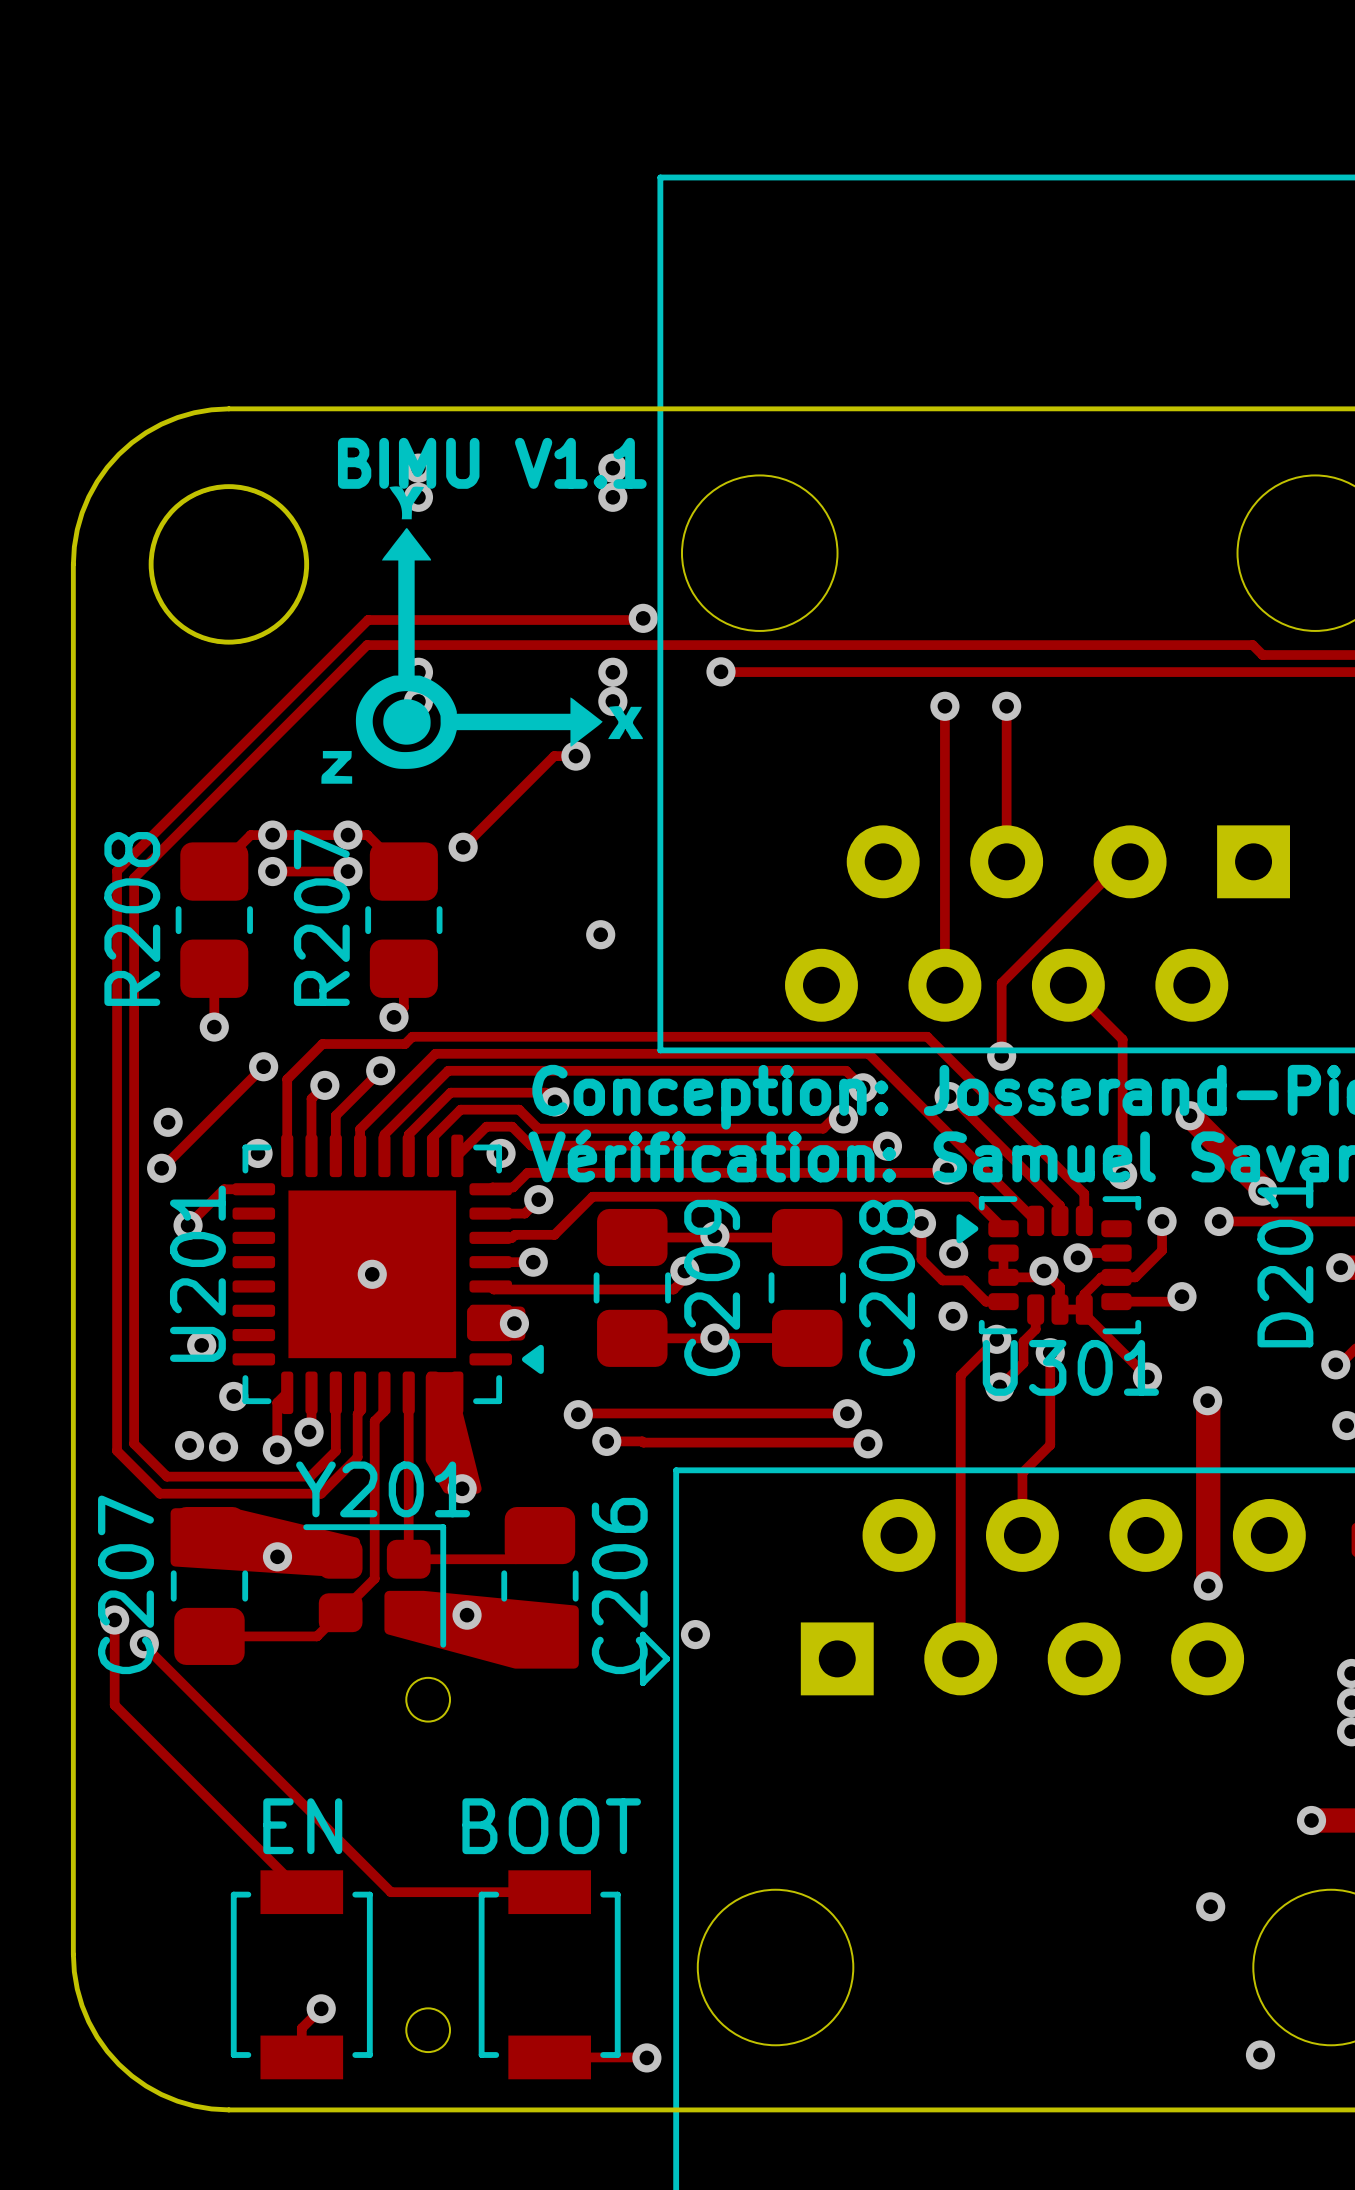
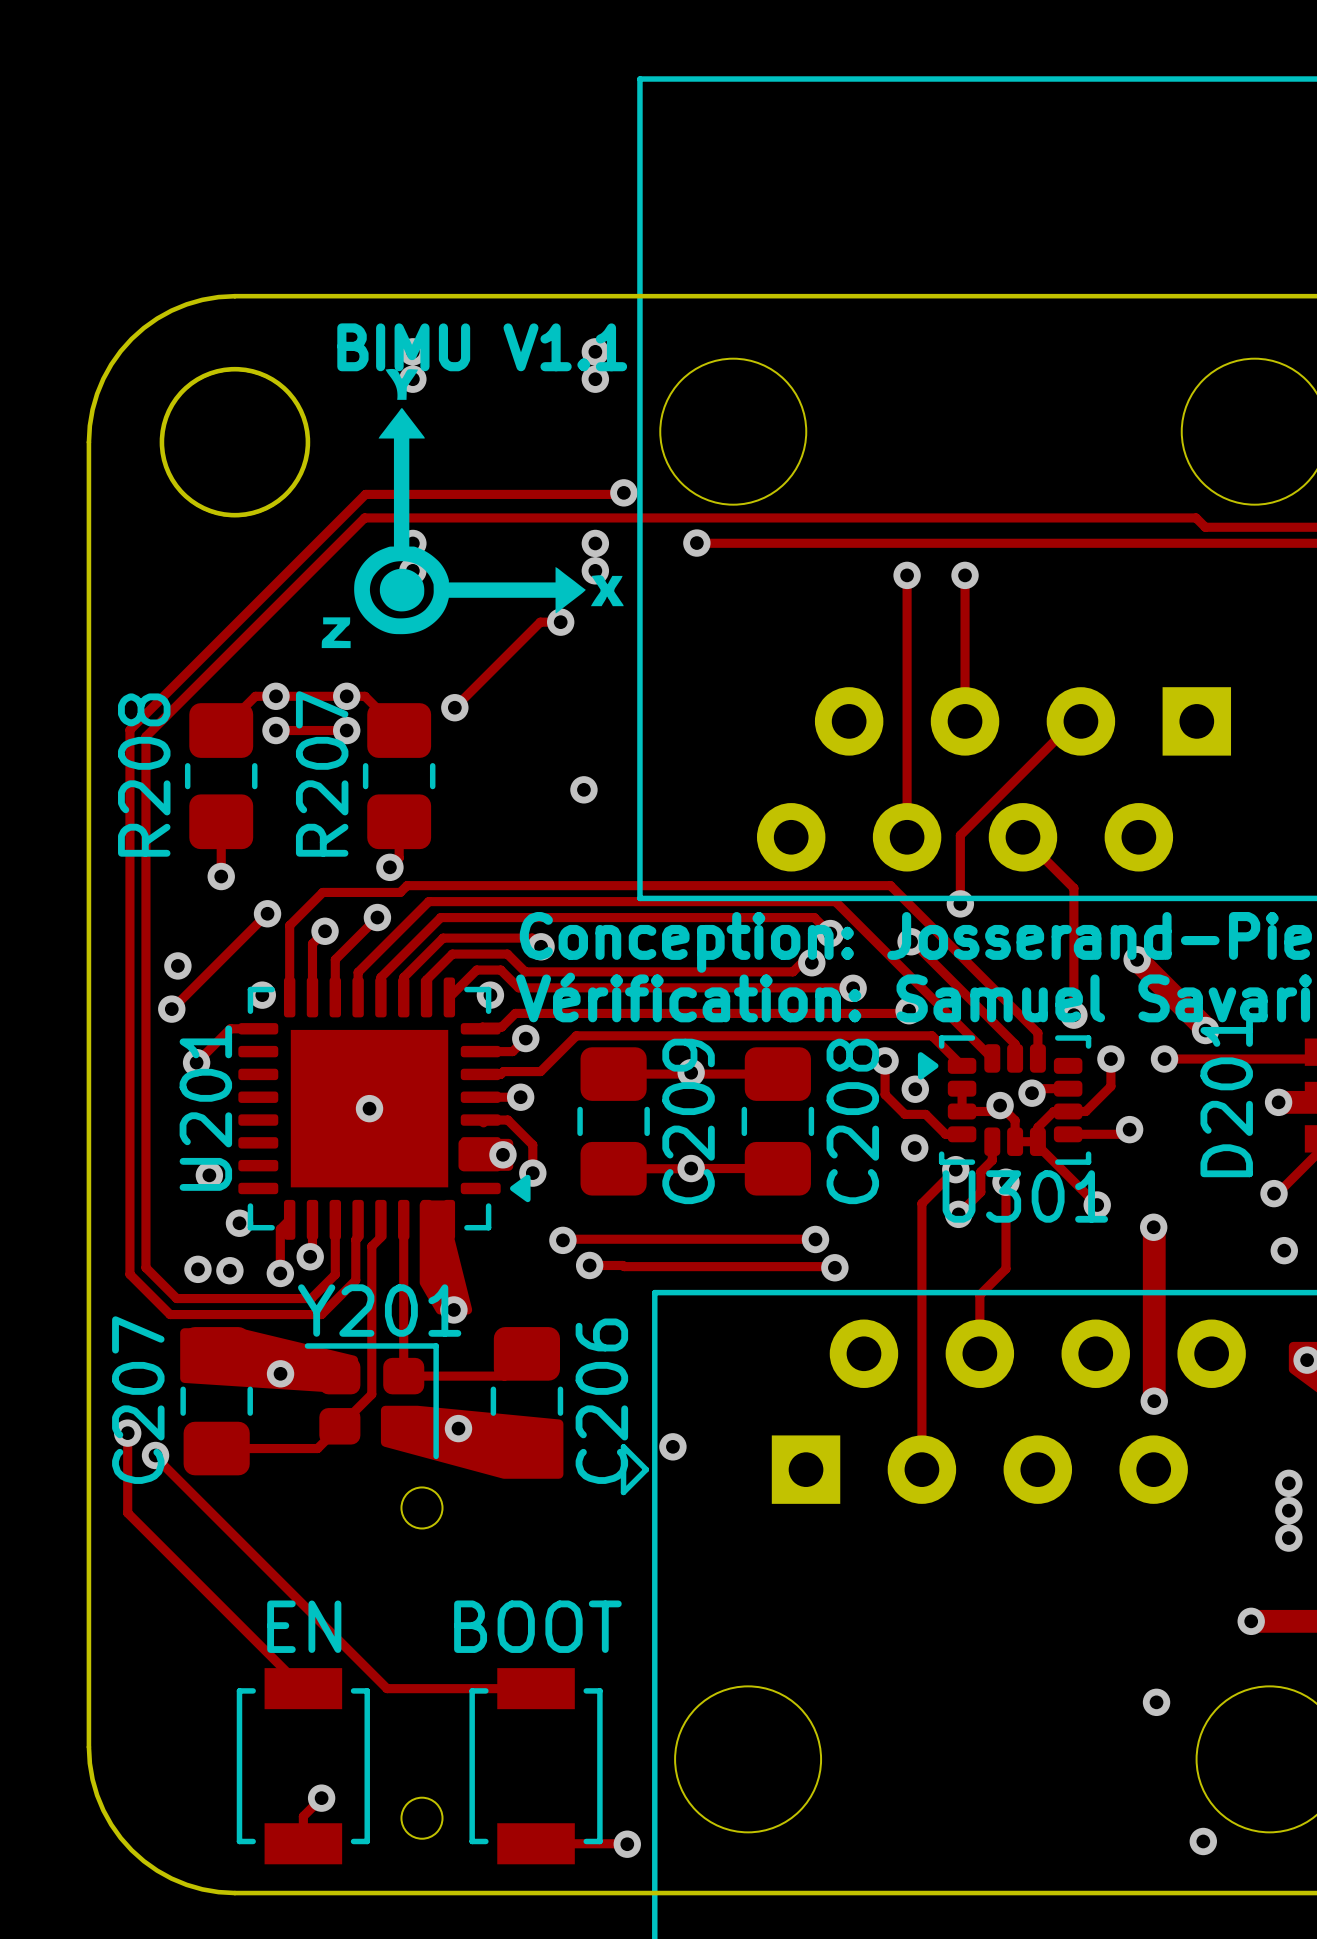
track: (684, 1271) (684, 1278) (673, 1289) (493, 1289) -> none
via position: (684, 1271) -> (532, 1173)
track: none -> (480, 1120) (507, 1120) (532, 1144) (532, 1173)

